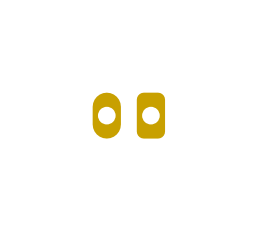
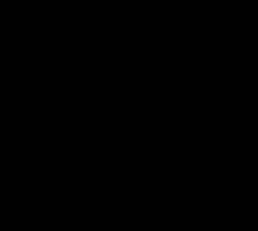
part: (128, 115) -> none

